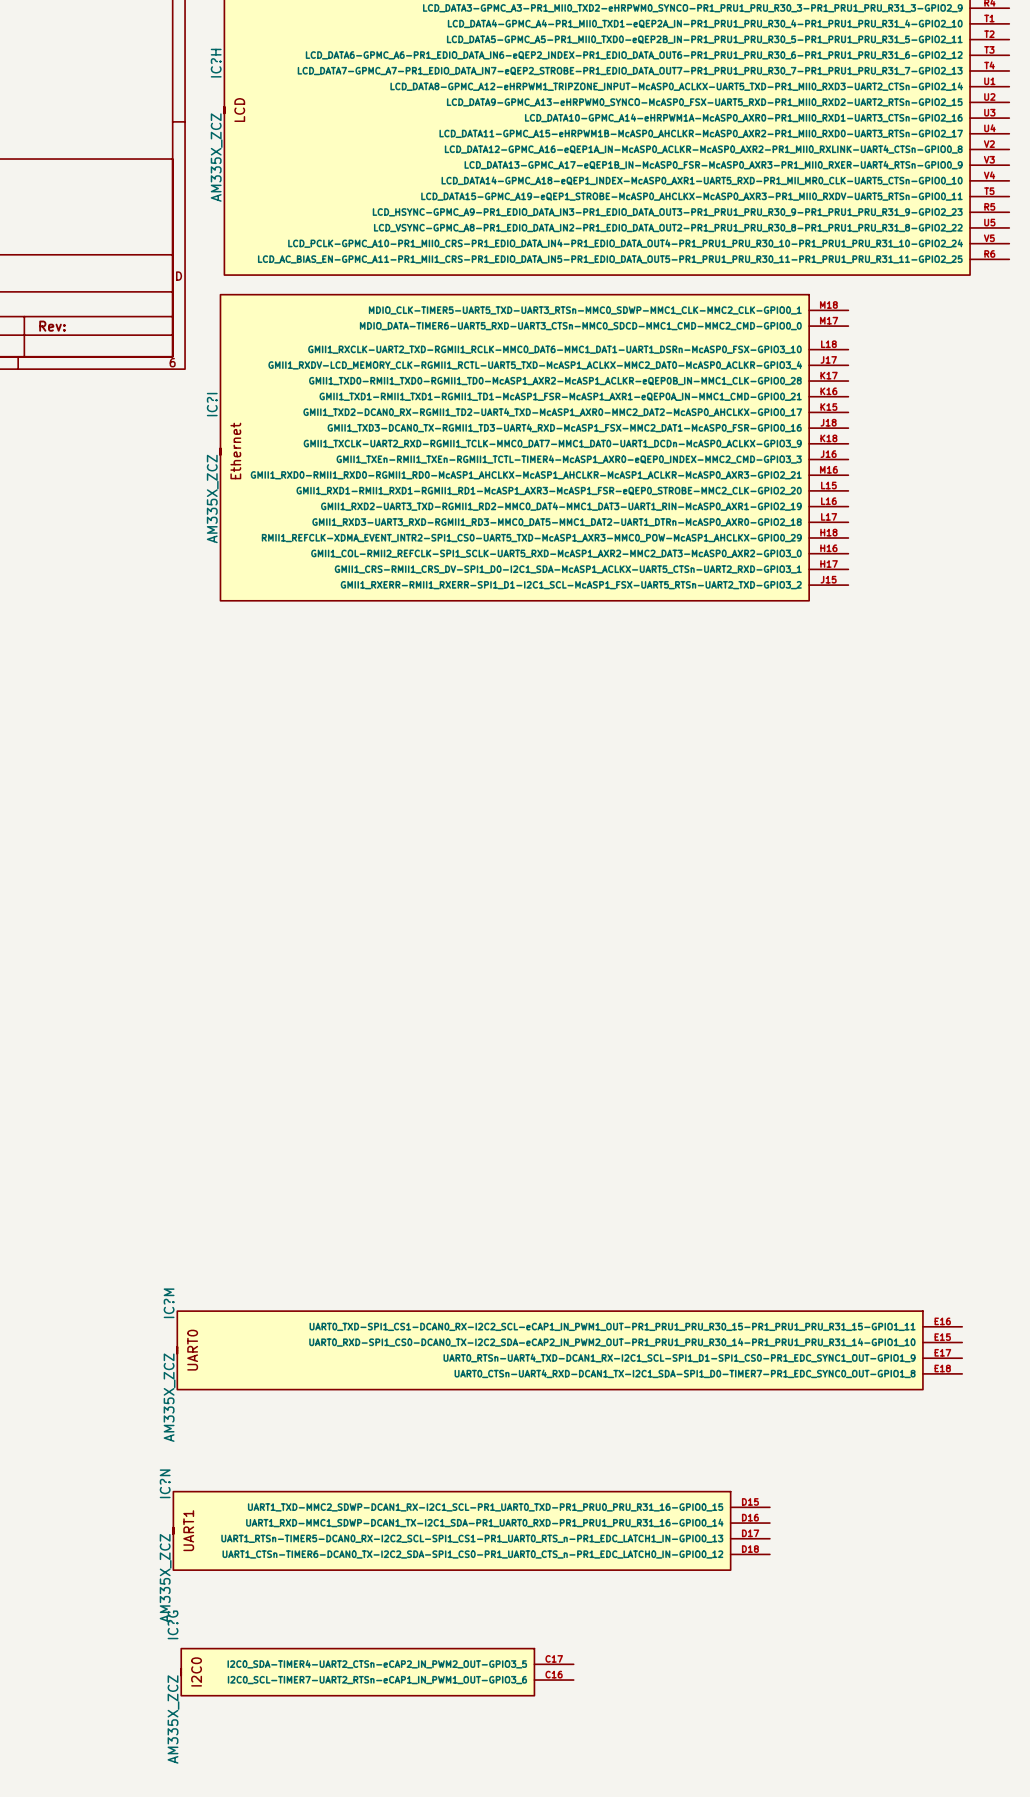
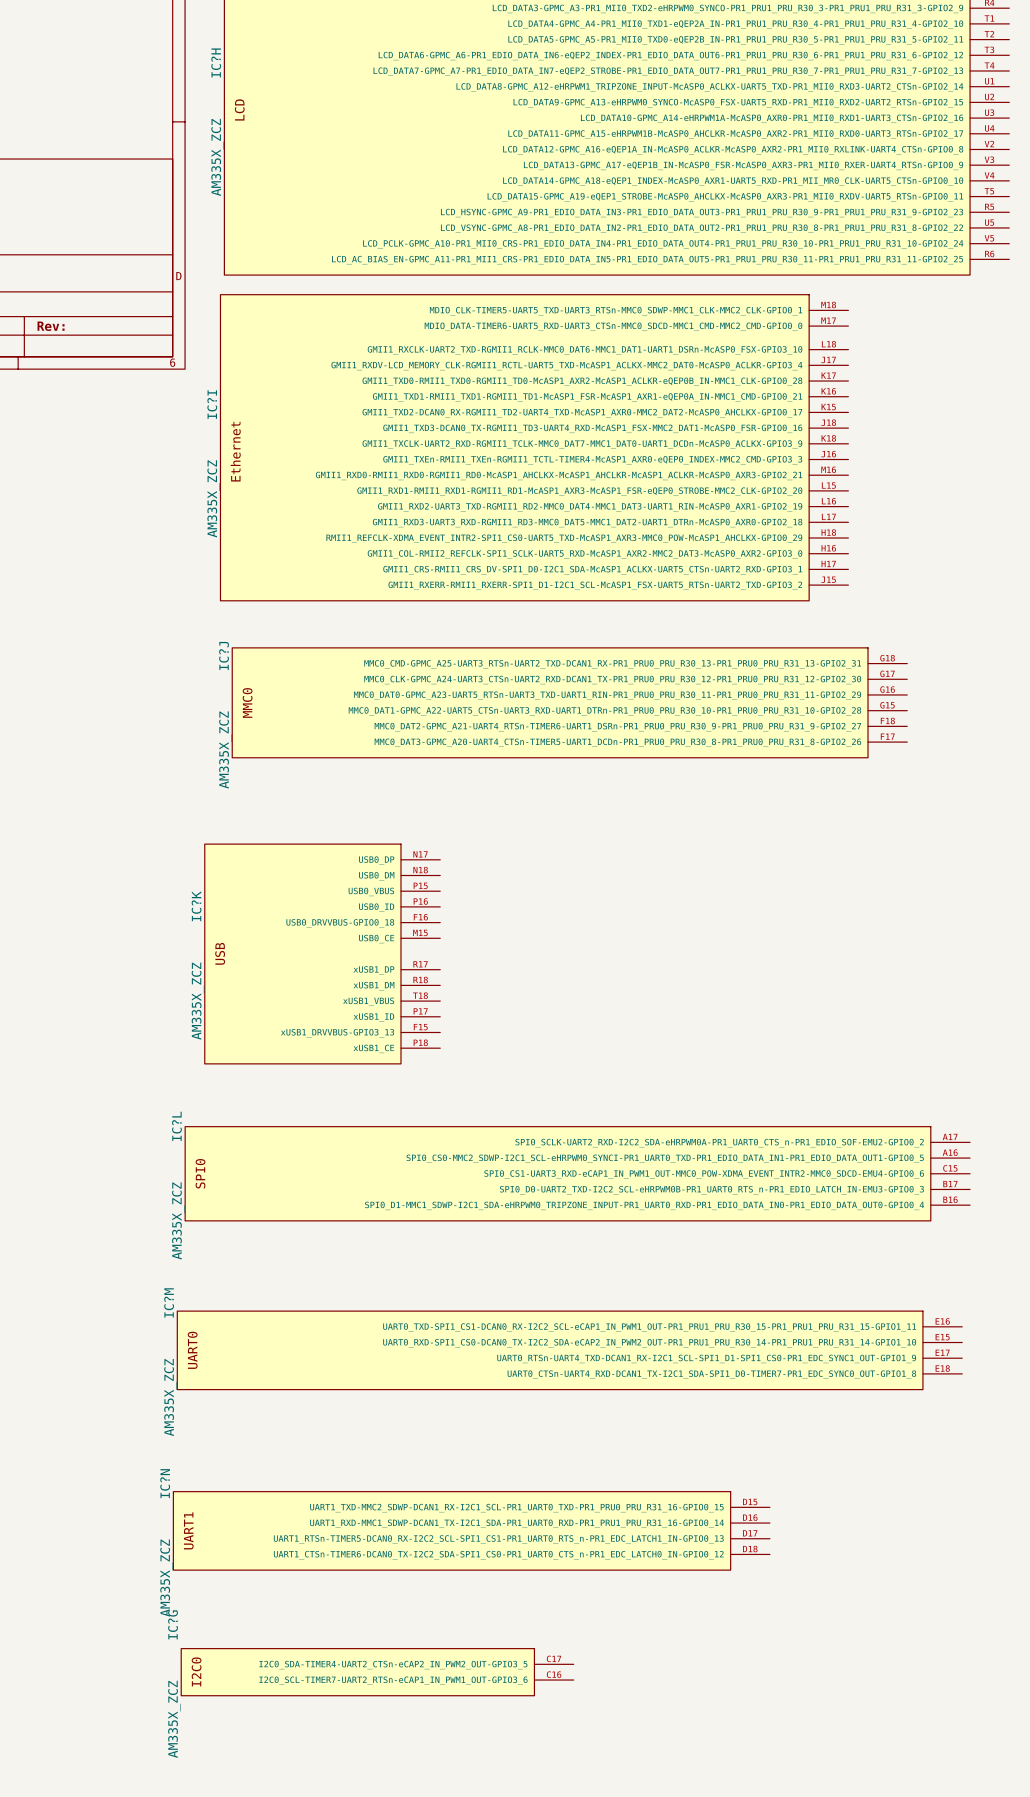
IC?J: none -> AM335X_ZCZ (569, 702)
IC?K: none -> AM335X_ZCZ (322, 953)
IC?L: none -> AM335X_ZCZ (577, 1173)

